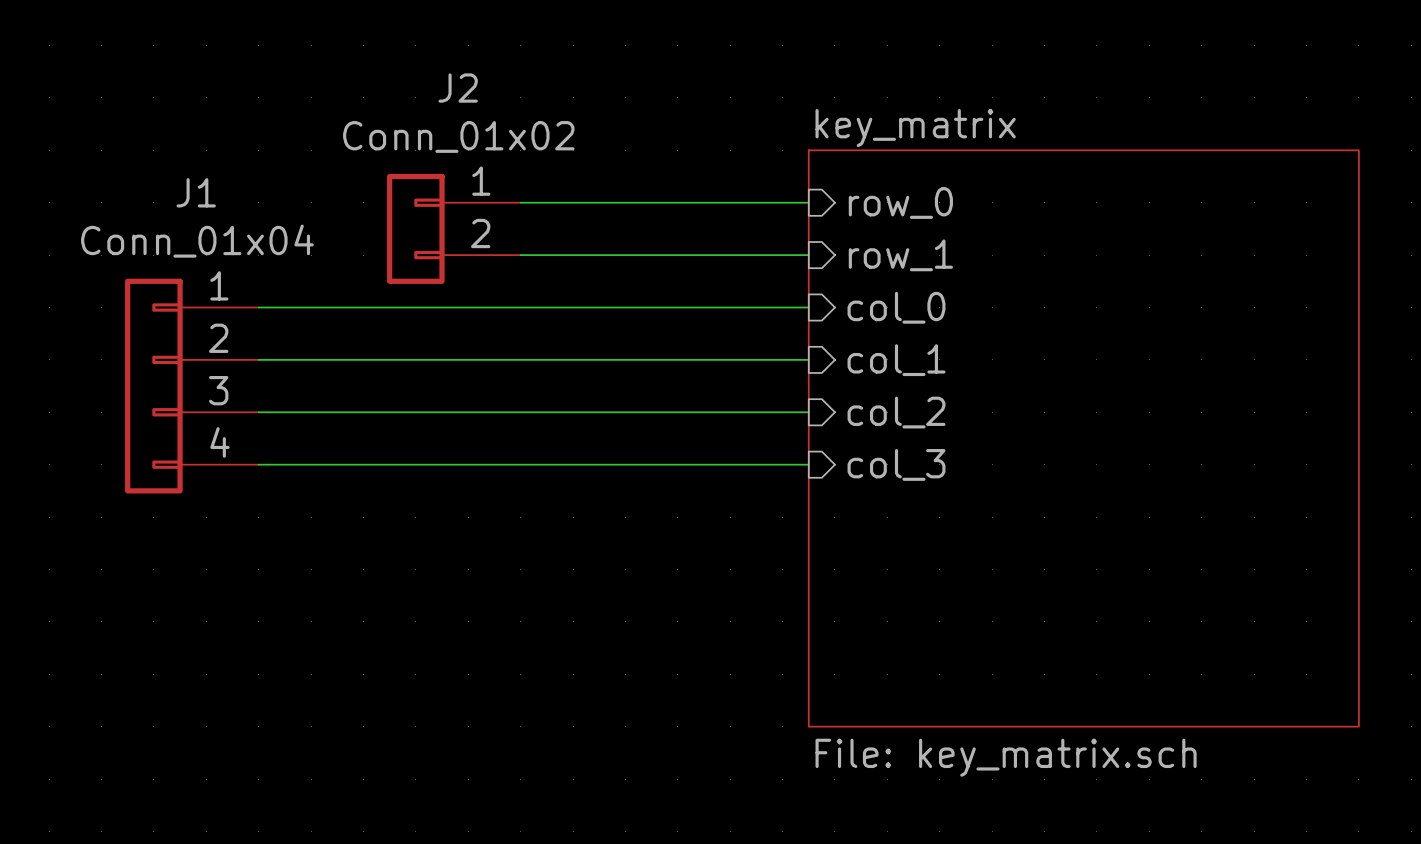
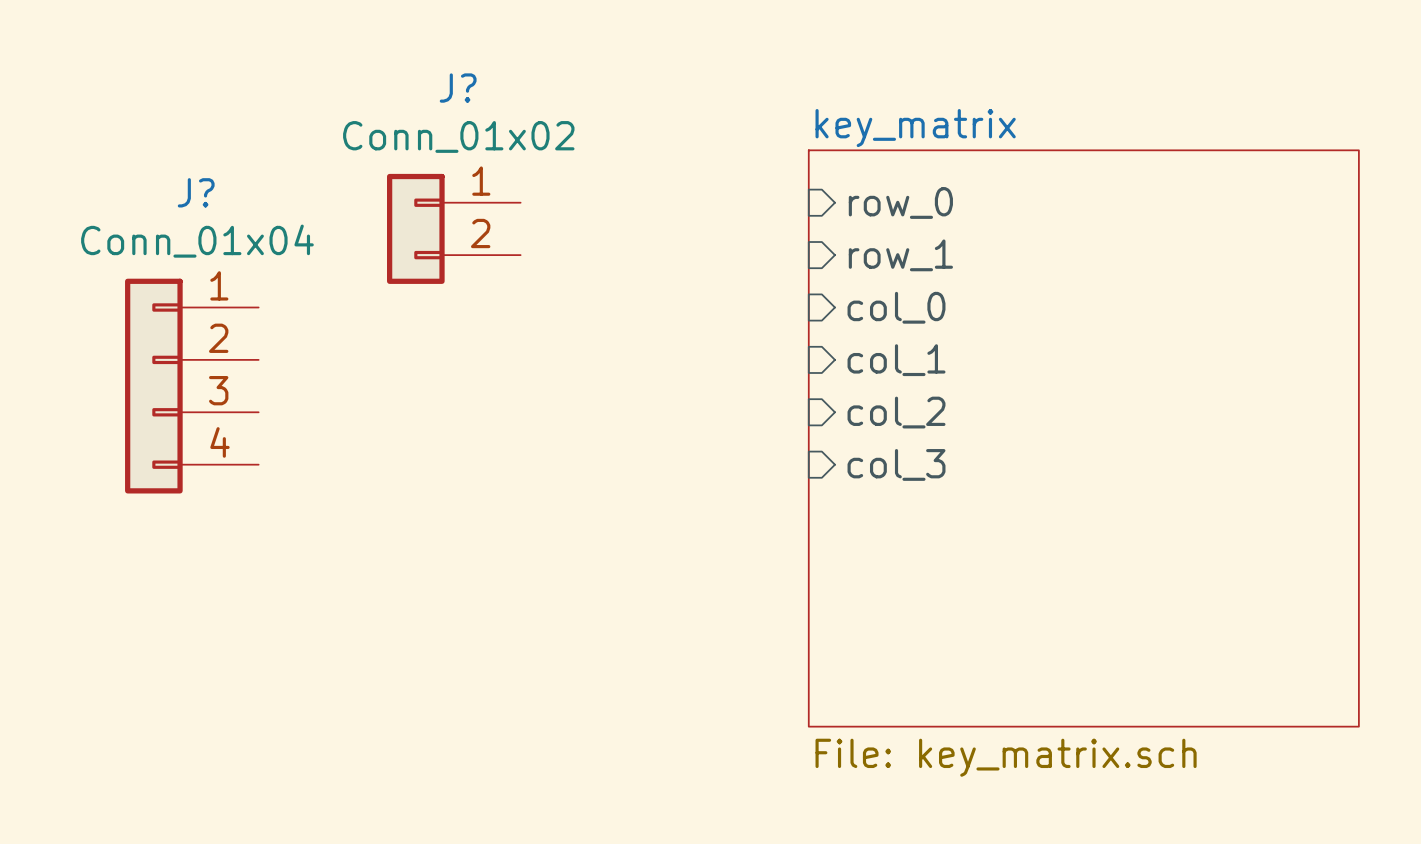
J2 name: J2 (458, 88) -> J? (458, 88)
J1 name: J1 (196, 192) -> J? (196, 192)
wire: (520, 202) (808, 202) -> none
wire: (520, 255) (808, 255) -> none
wire: (258, 307) (808, 307) -> none
wire: (258, 359) (808, 359) -> none
wire: (258, 412) (808, 412) -> none
wire: (258, 464) (808, 464) -> none

